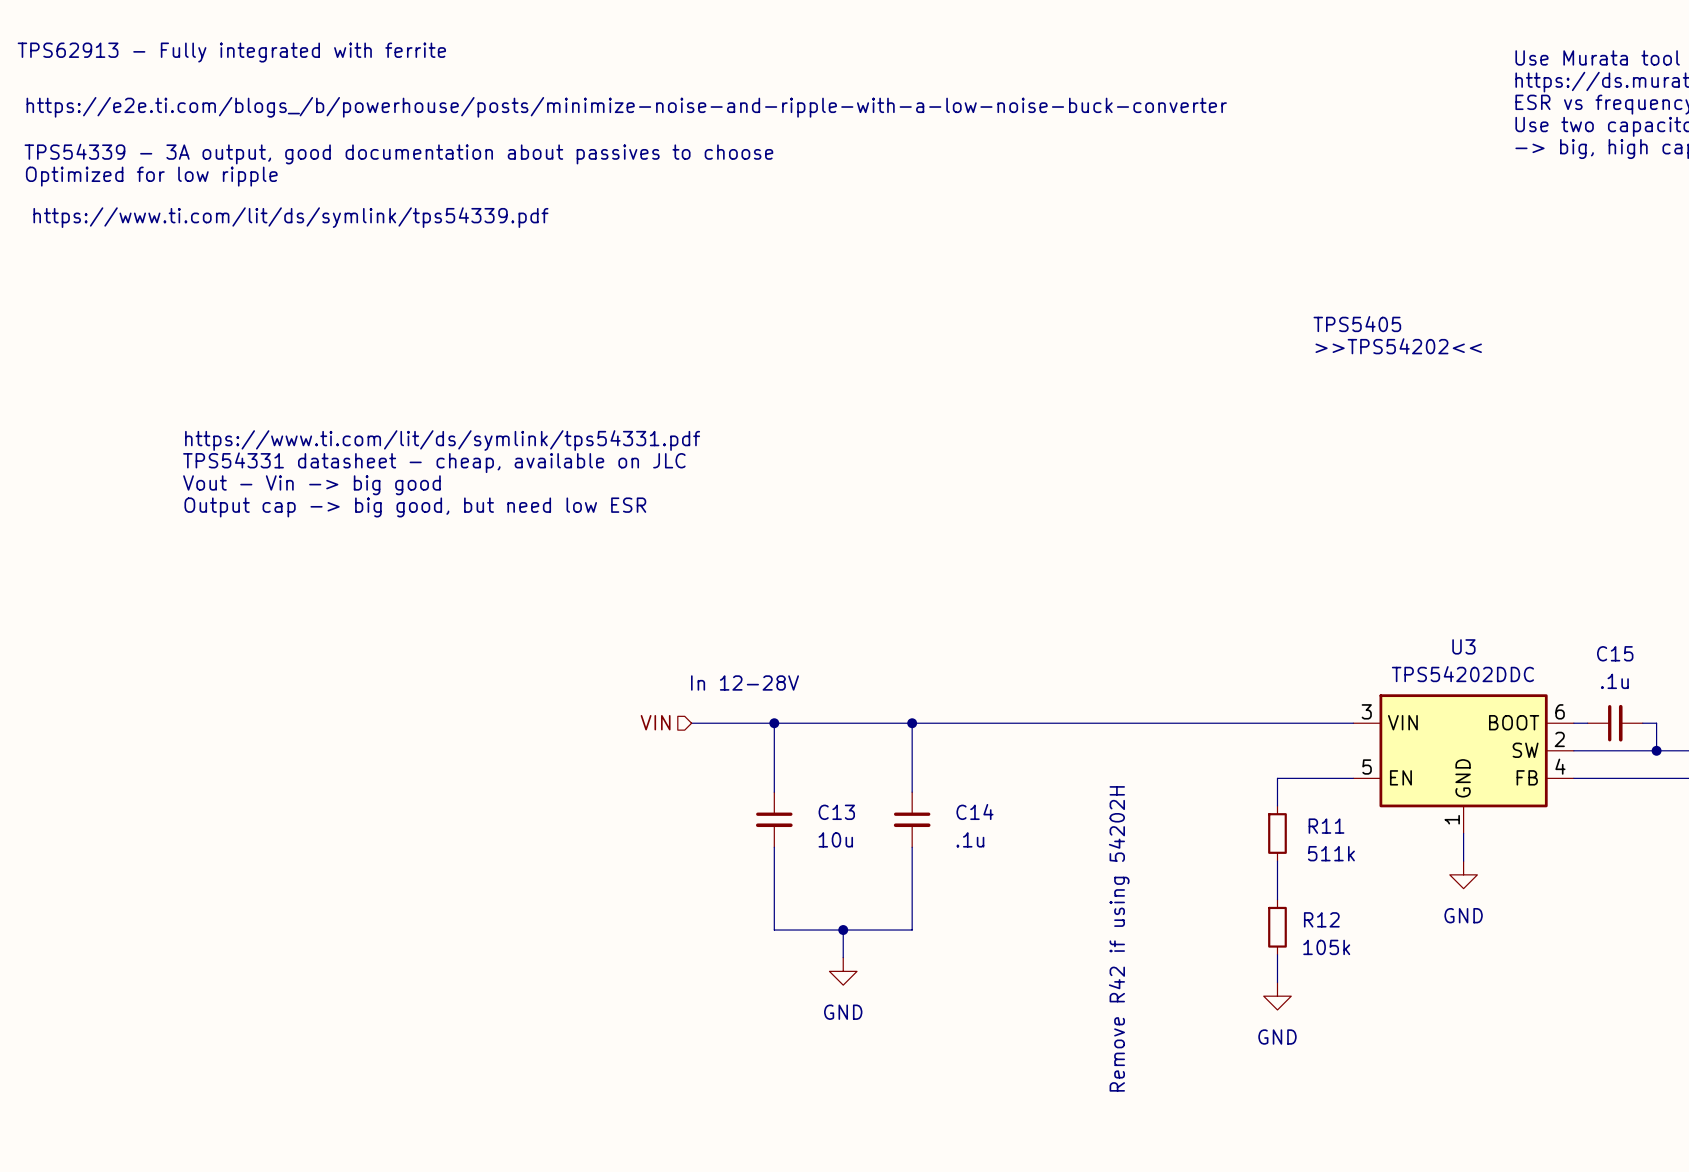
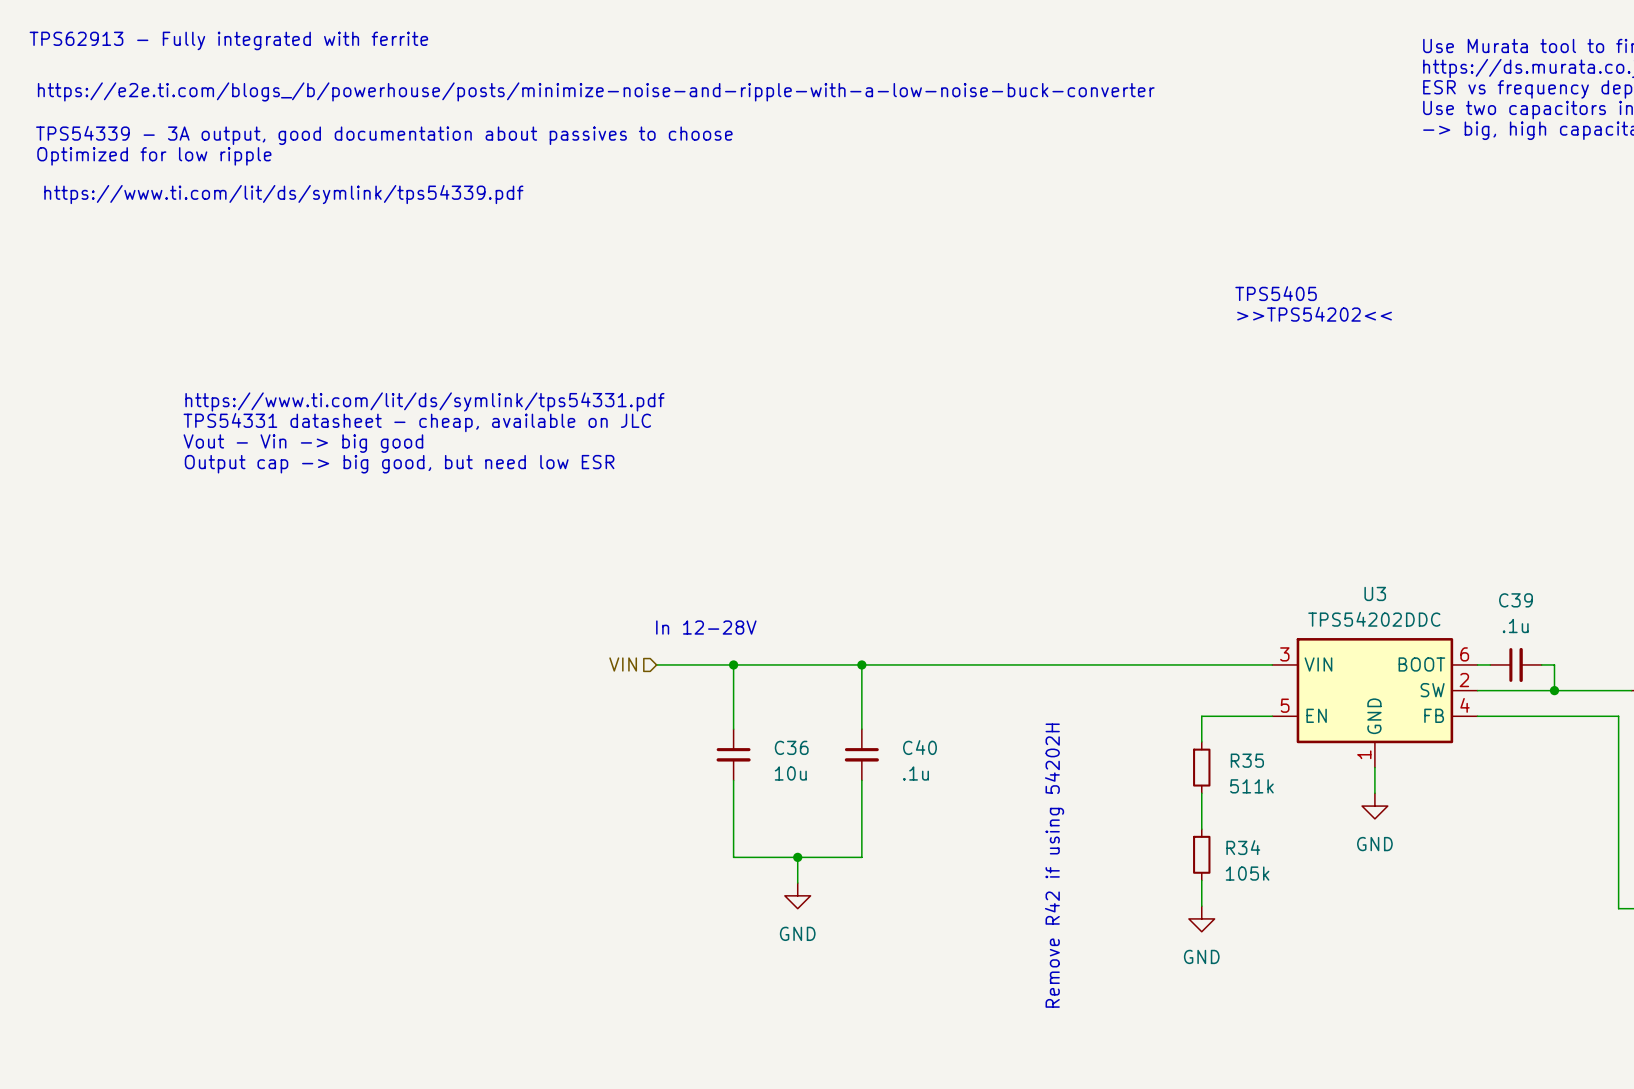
C15 name: C15 (1615, 653) -> C39 (1516, 600)
C14 name: C14 (974, 811) -> C40 (919, 747)
C13 name: C13 (836, 812) -> C36 (791, 747)
R11 name: R11 (1326, 826) -> R35 (1247, 760)
R12 name: R12 (1321, 919) -> R34 (1243, 847)

